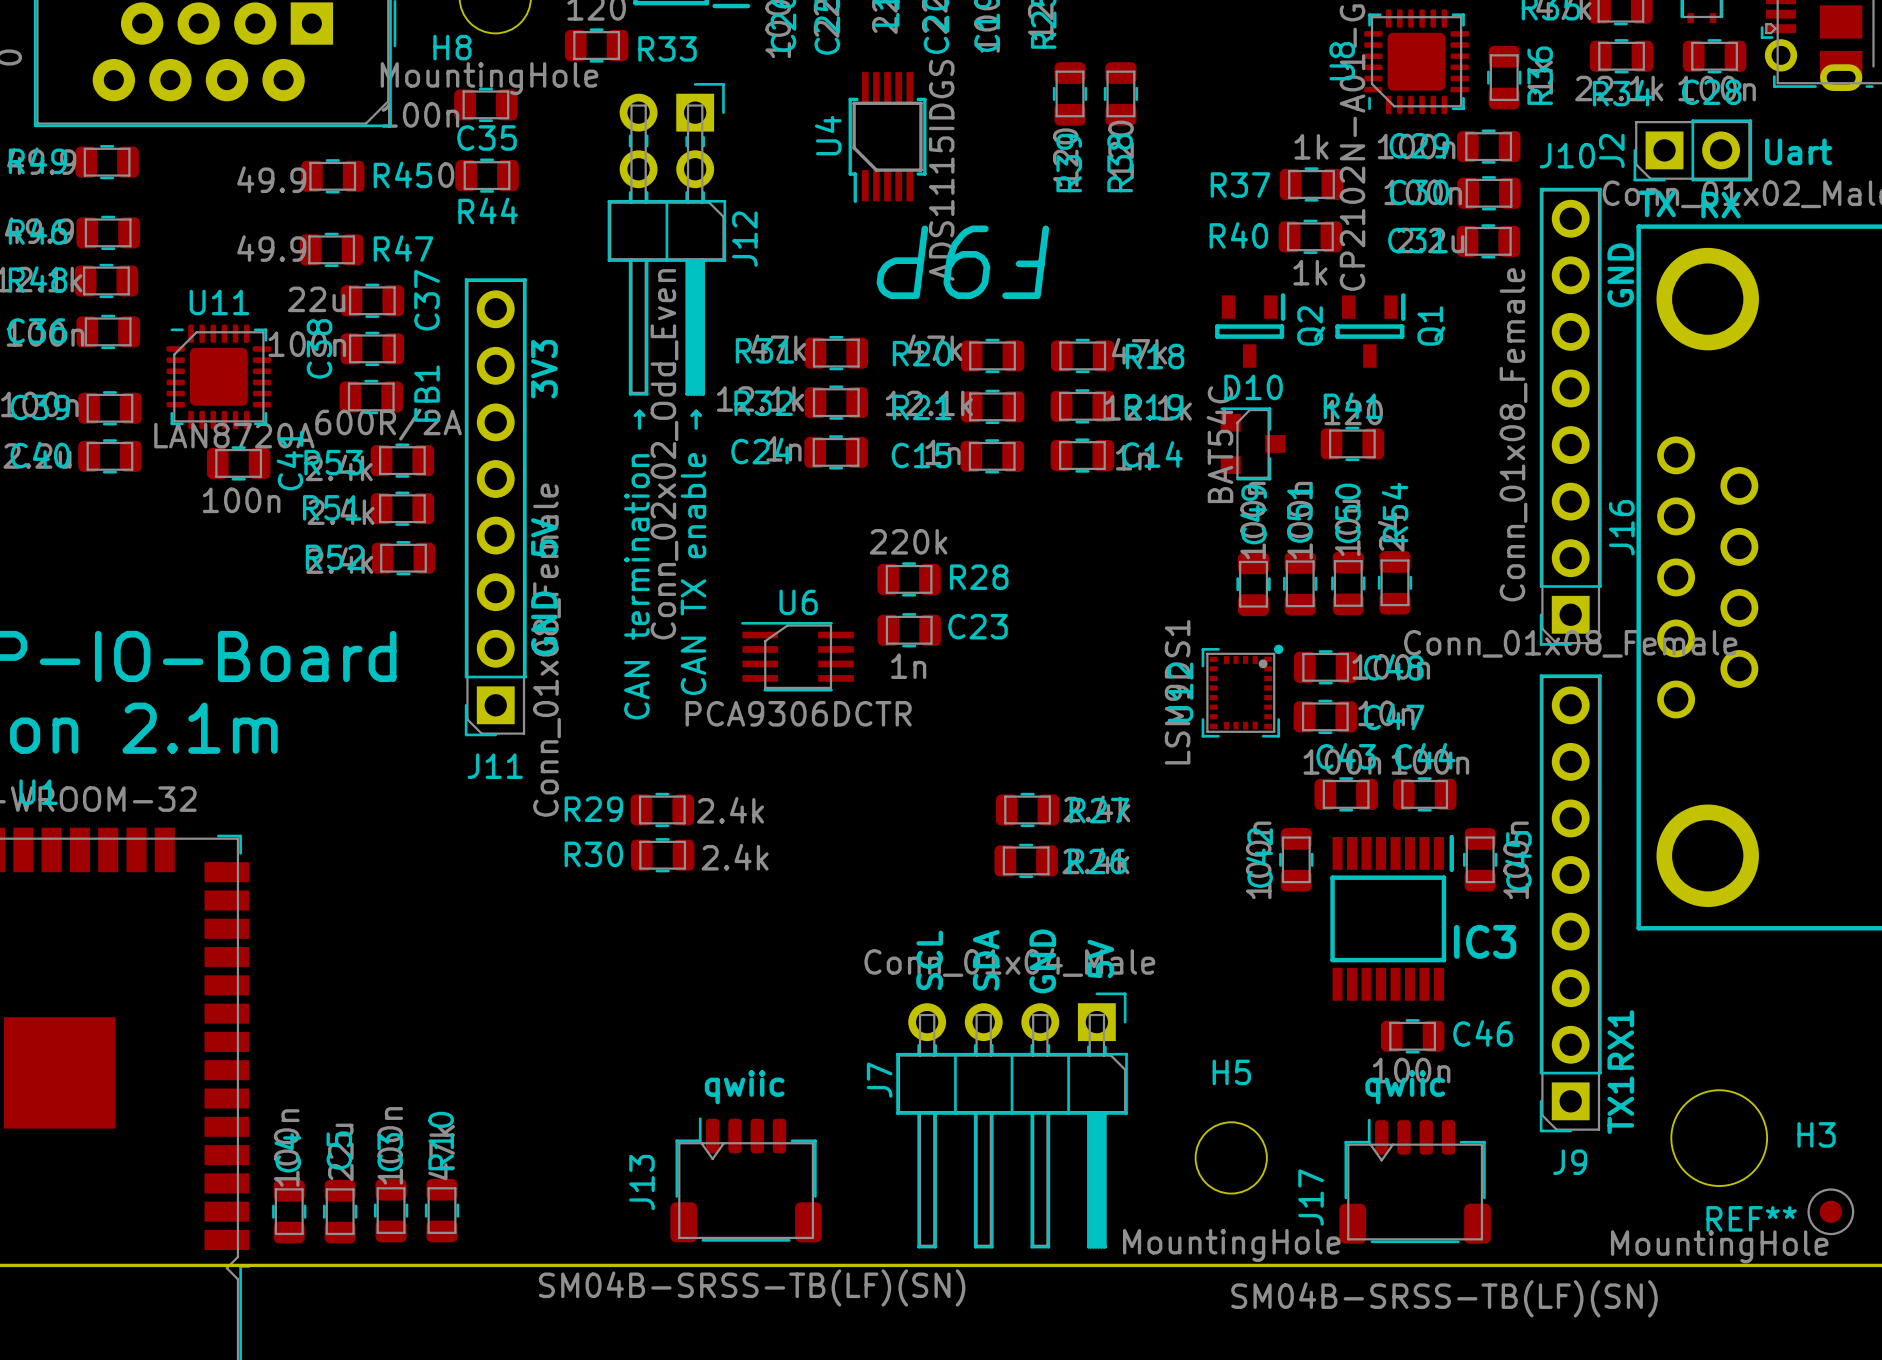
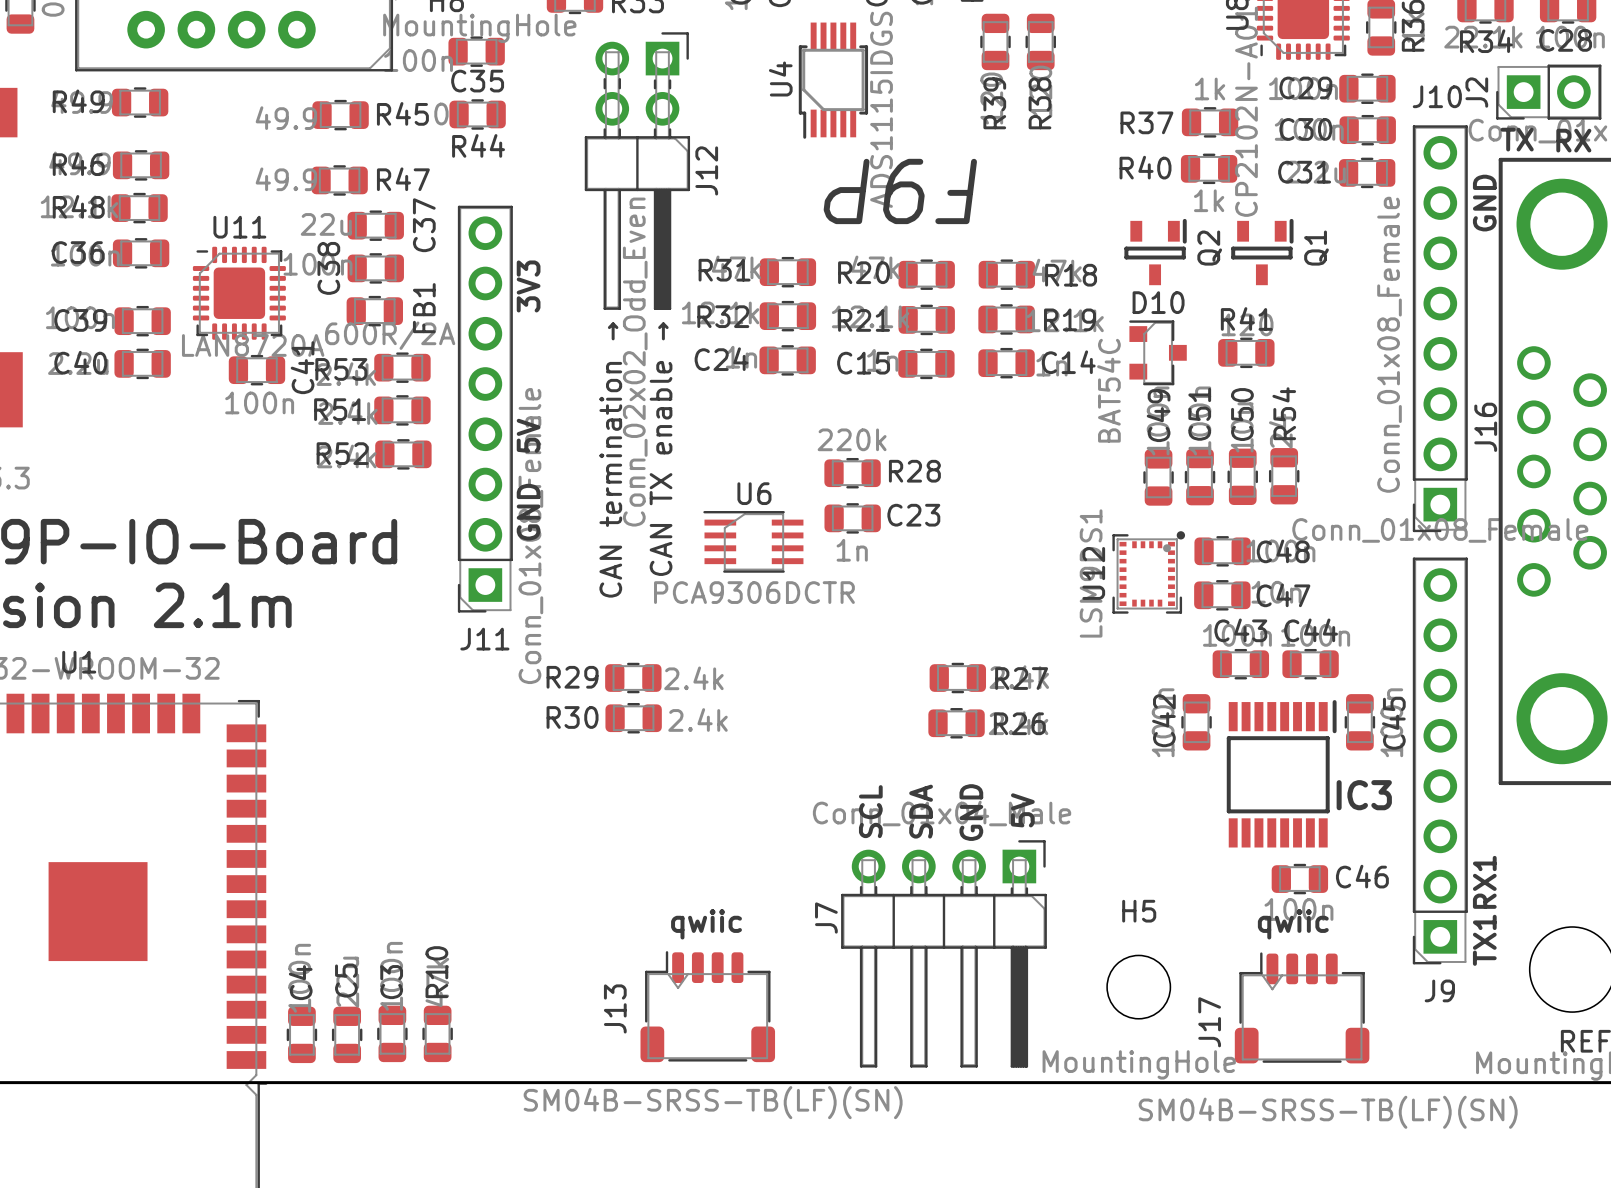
D10 value position: BAT54C (1219, 444) -> BAT54C (1108, 390)

